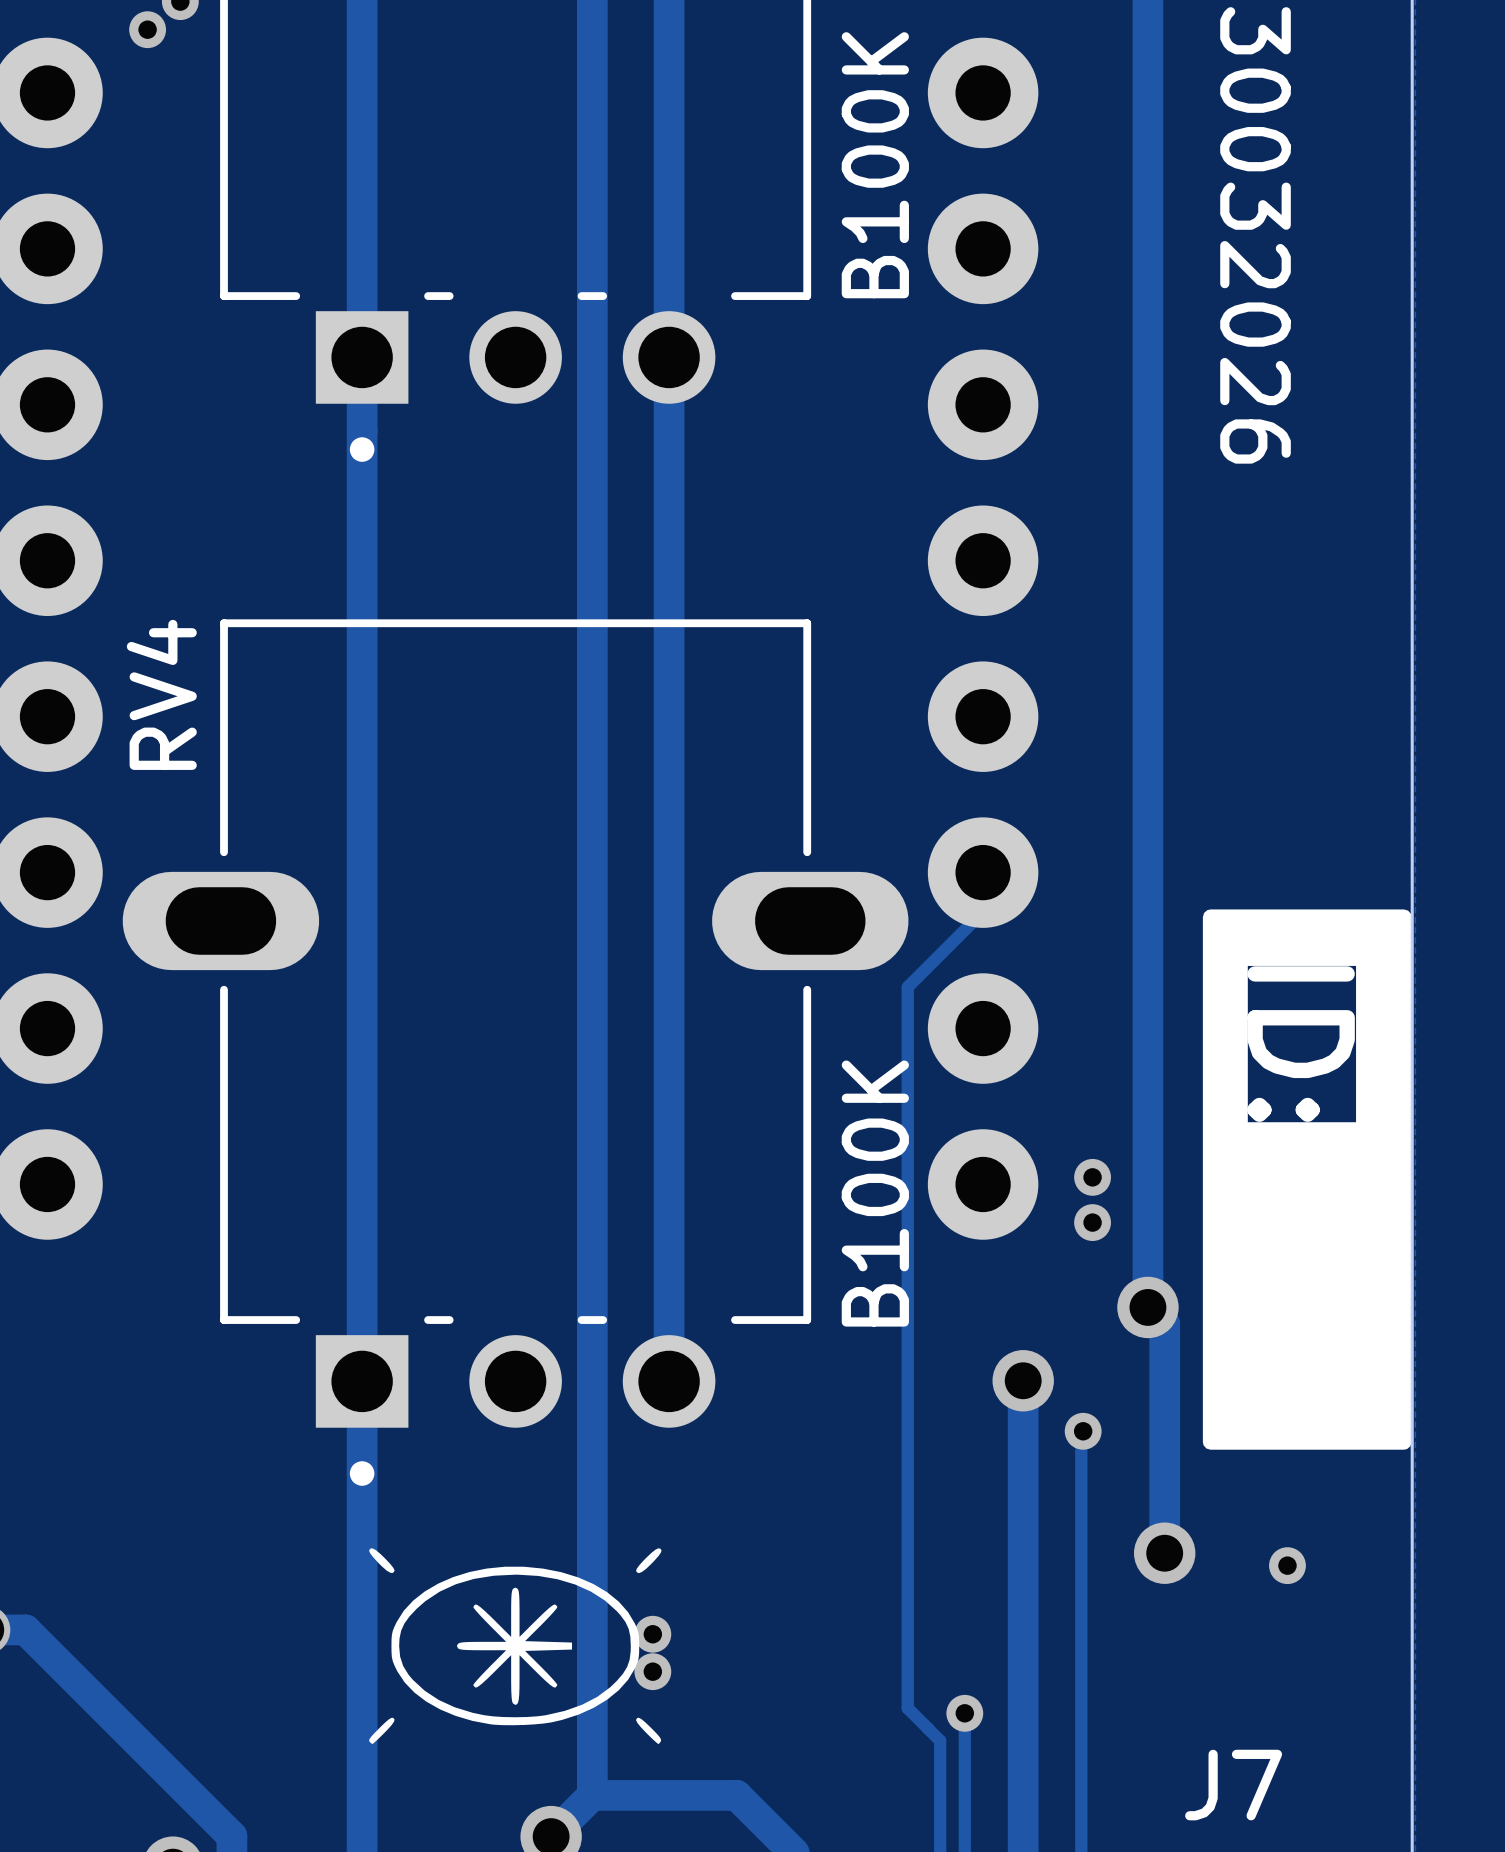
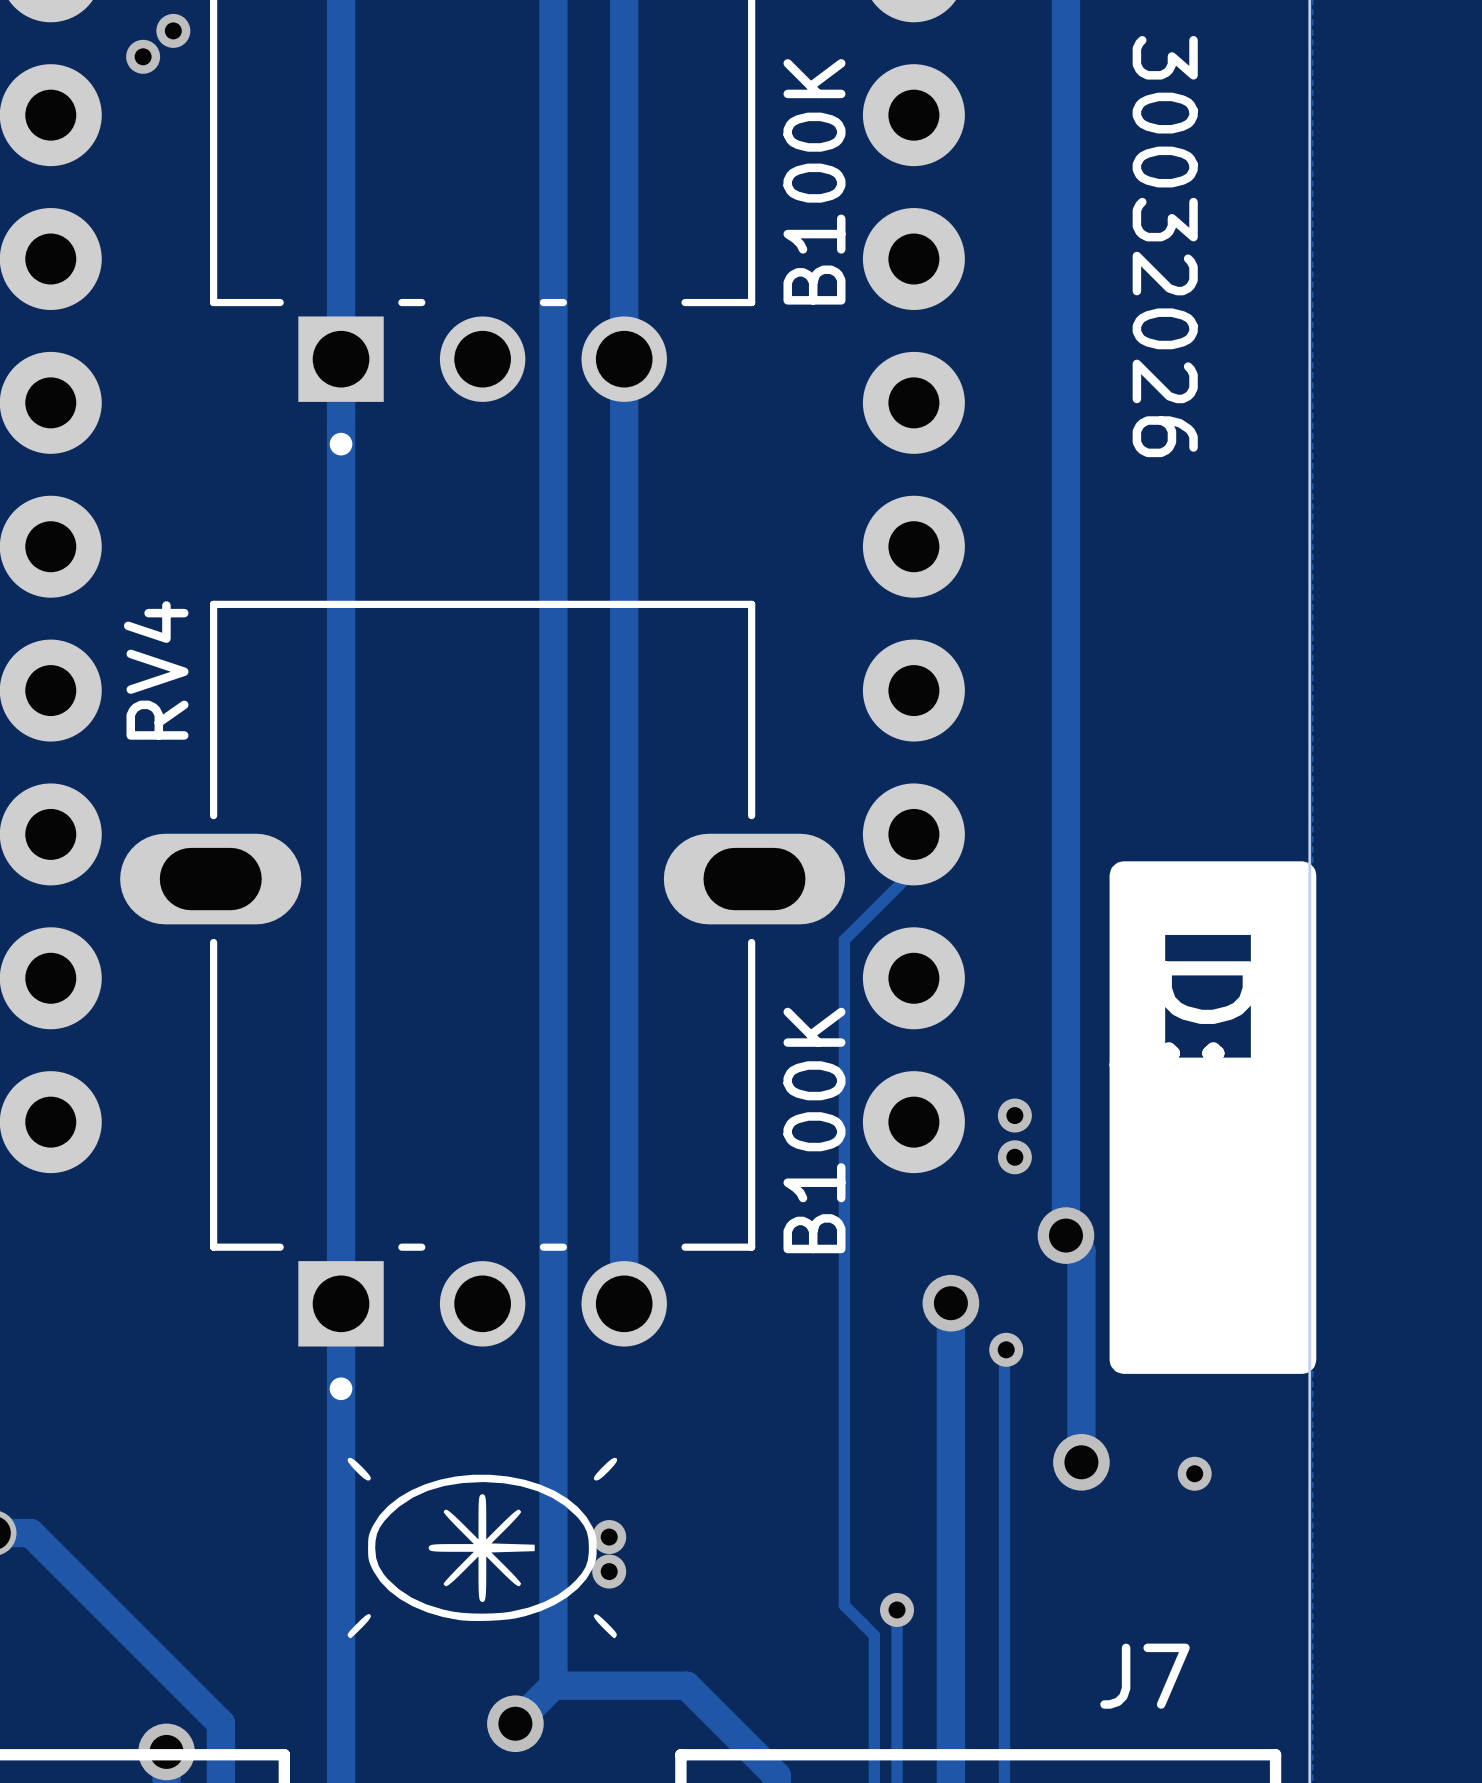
drawing shape: [1202, 909, 1412, 1450] -> [1109, 861, 1317, 1374]

